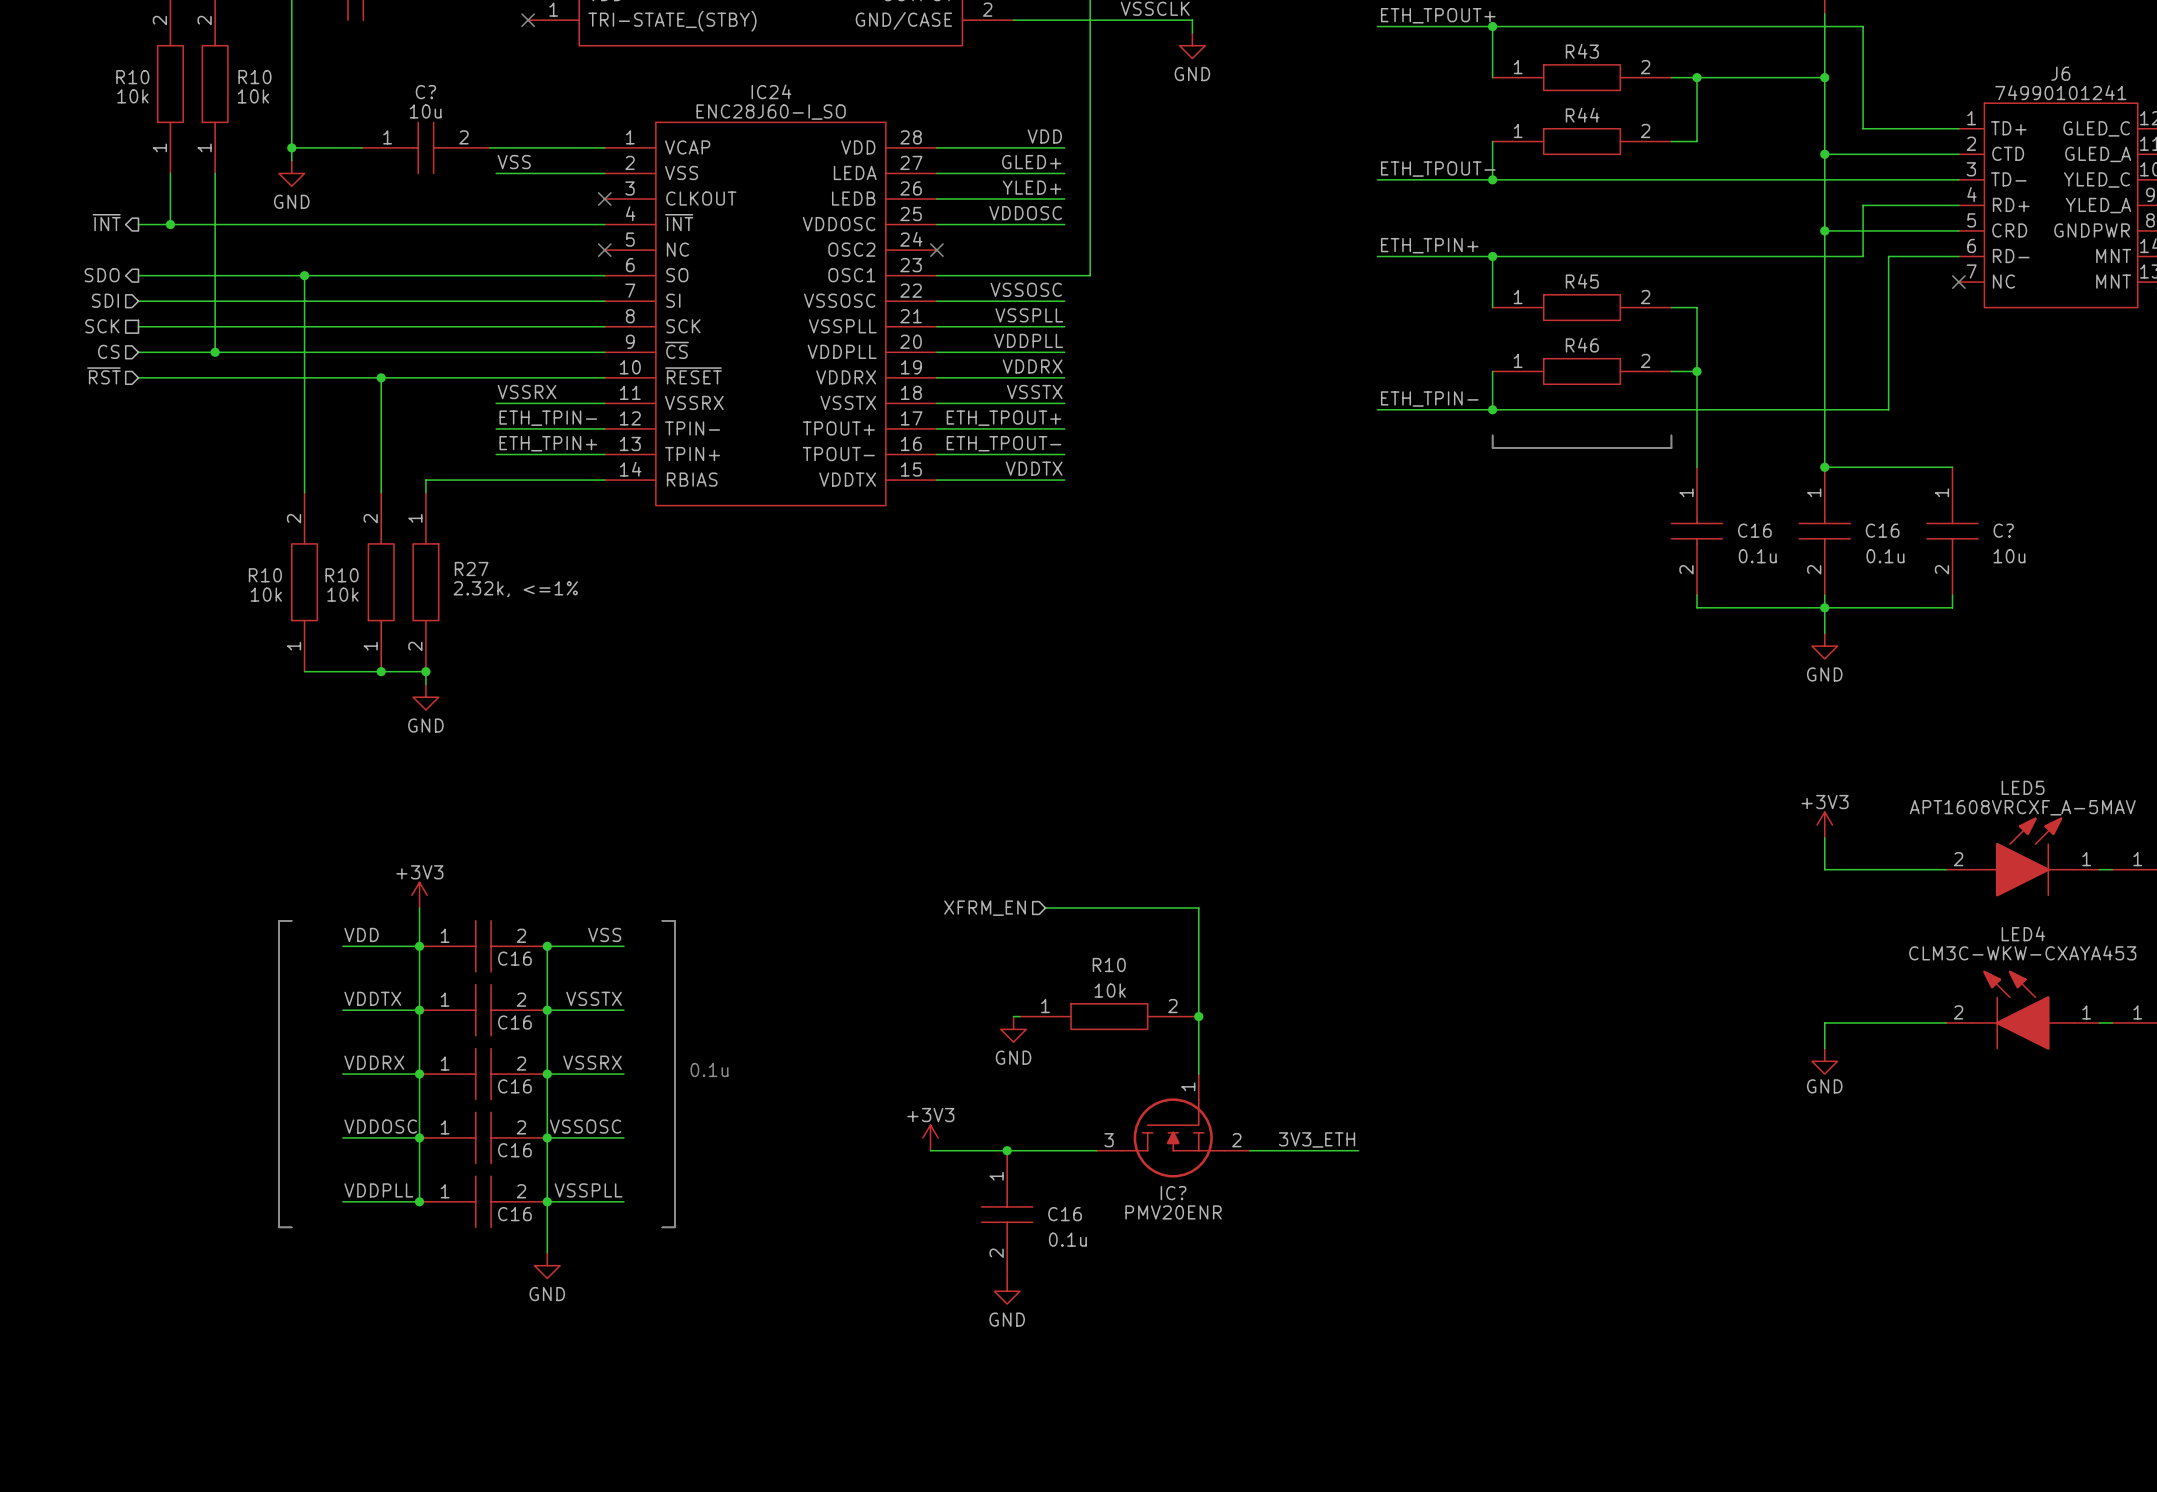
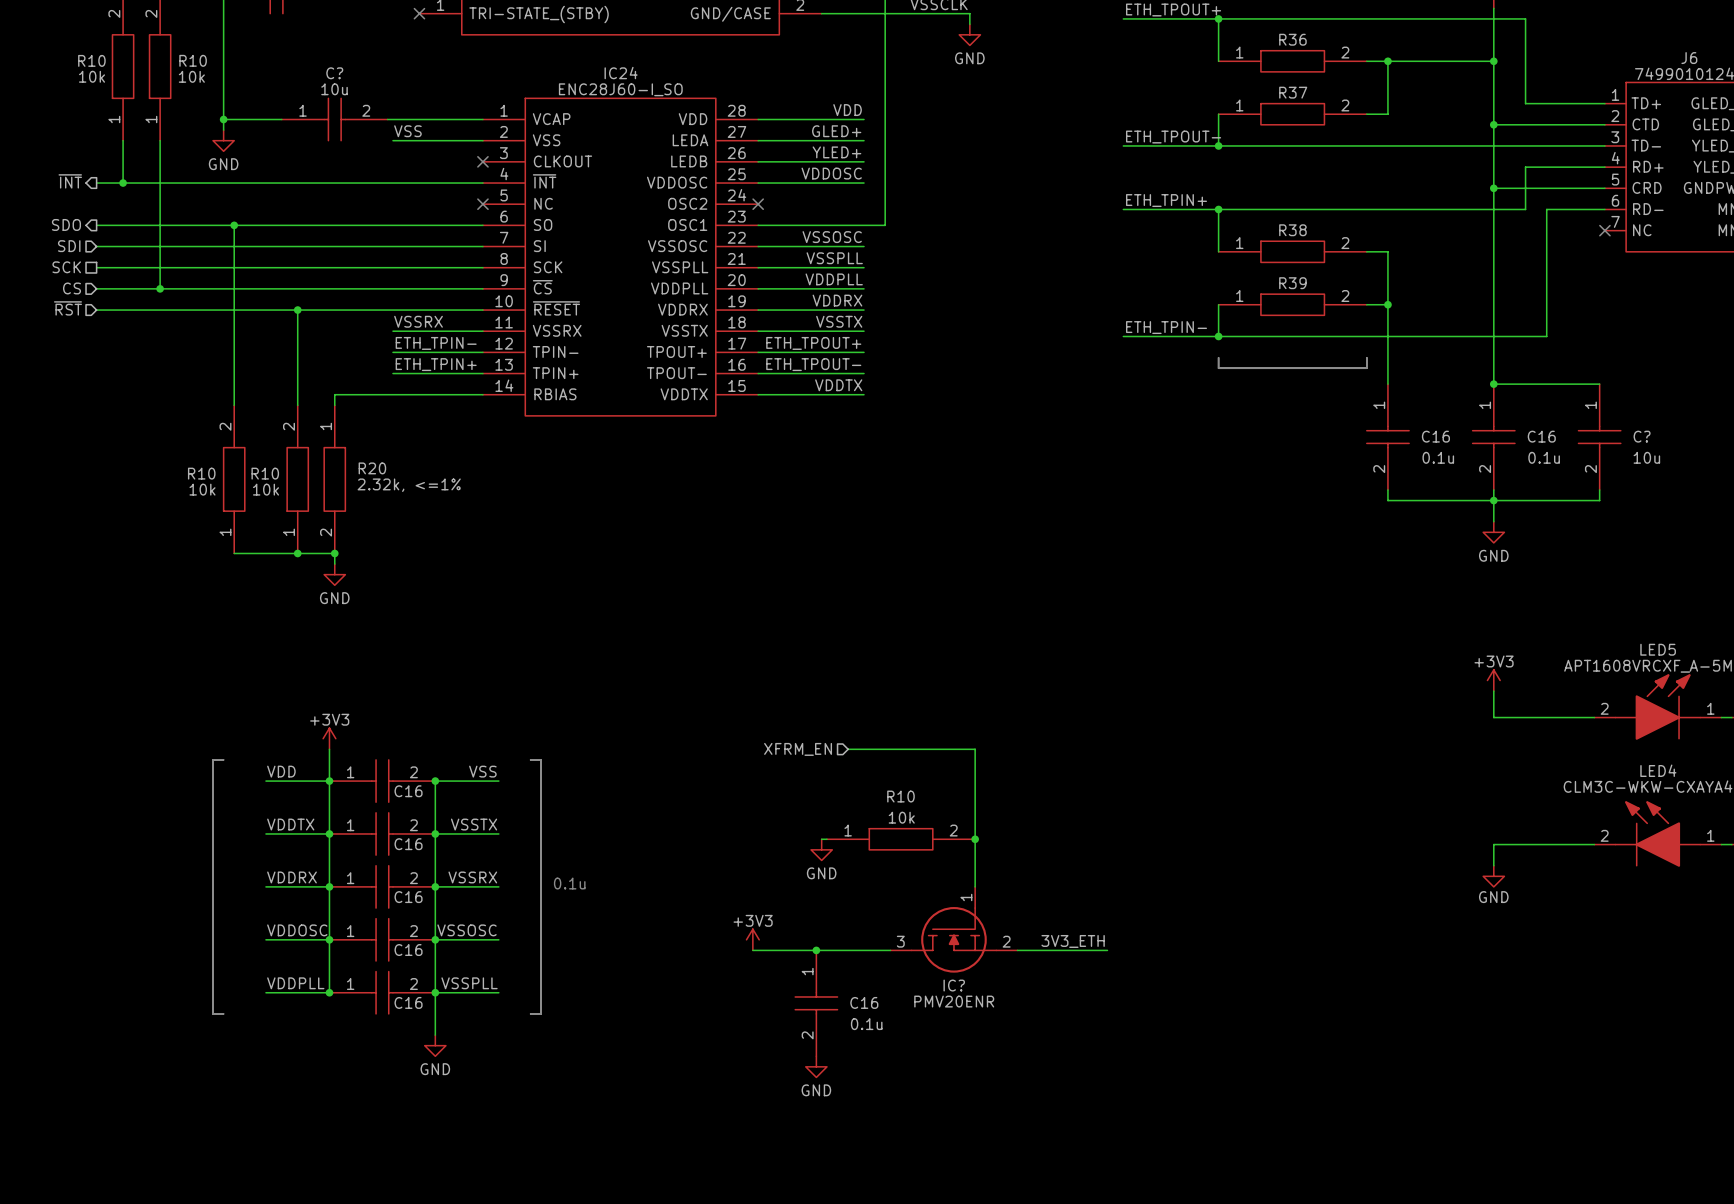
R43 name: R43 (1582, 51) -> R36 (1292, 39)
R44 name: R44 (1582, 115) -> R37 (1293, 92)
R45 name: R45 (1582, 281) -> R38 (1292, 230)
R46 name: R46 (1582, 345) -> R39 (1292, 283)
R27 name: R27 (471, 569) -> R20 (372, 468)

